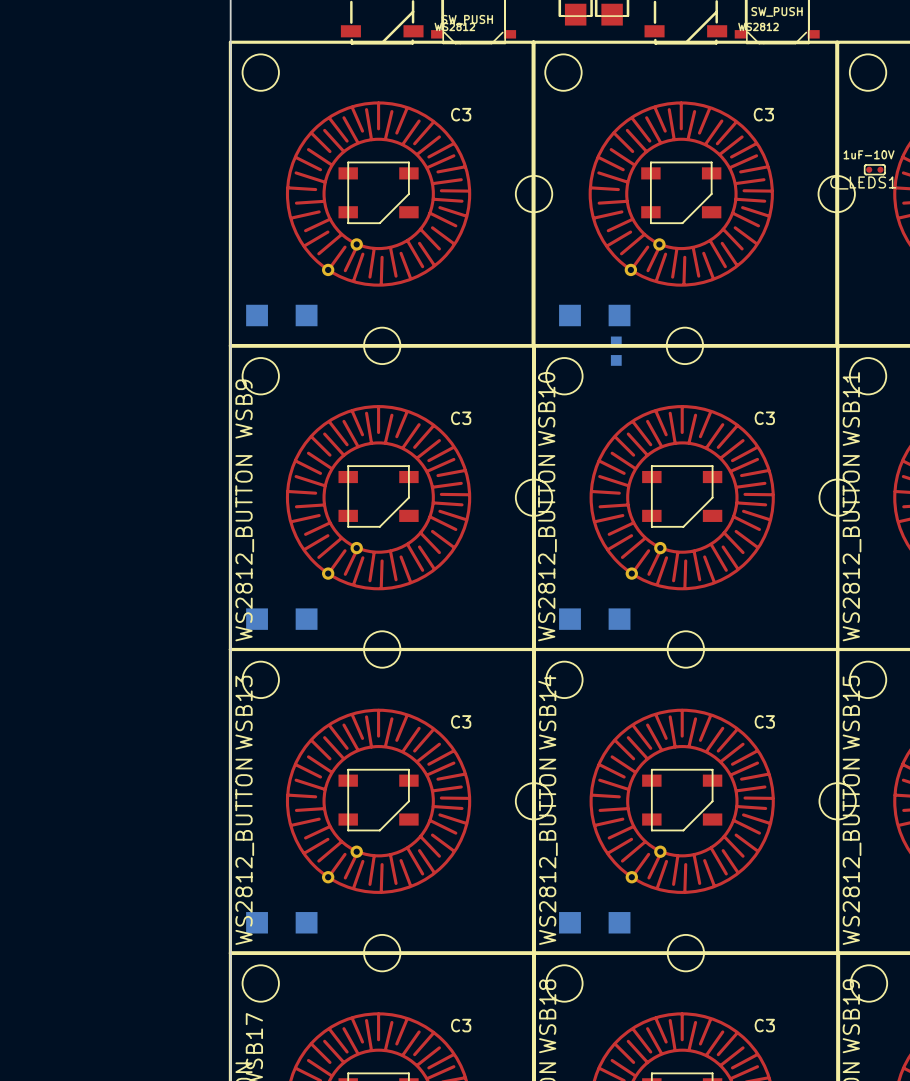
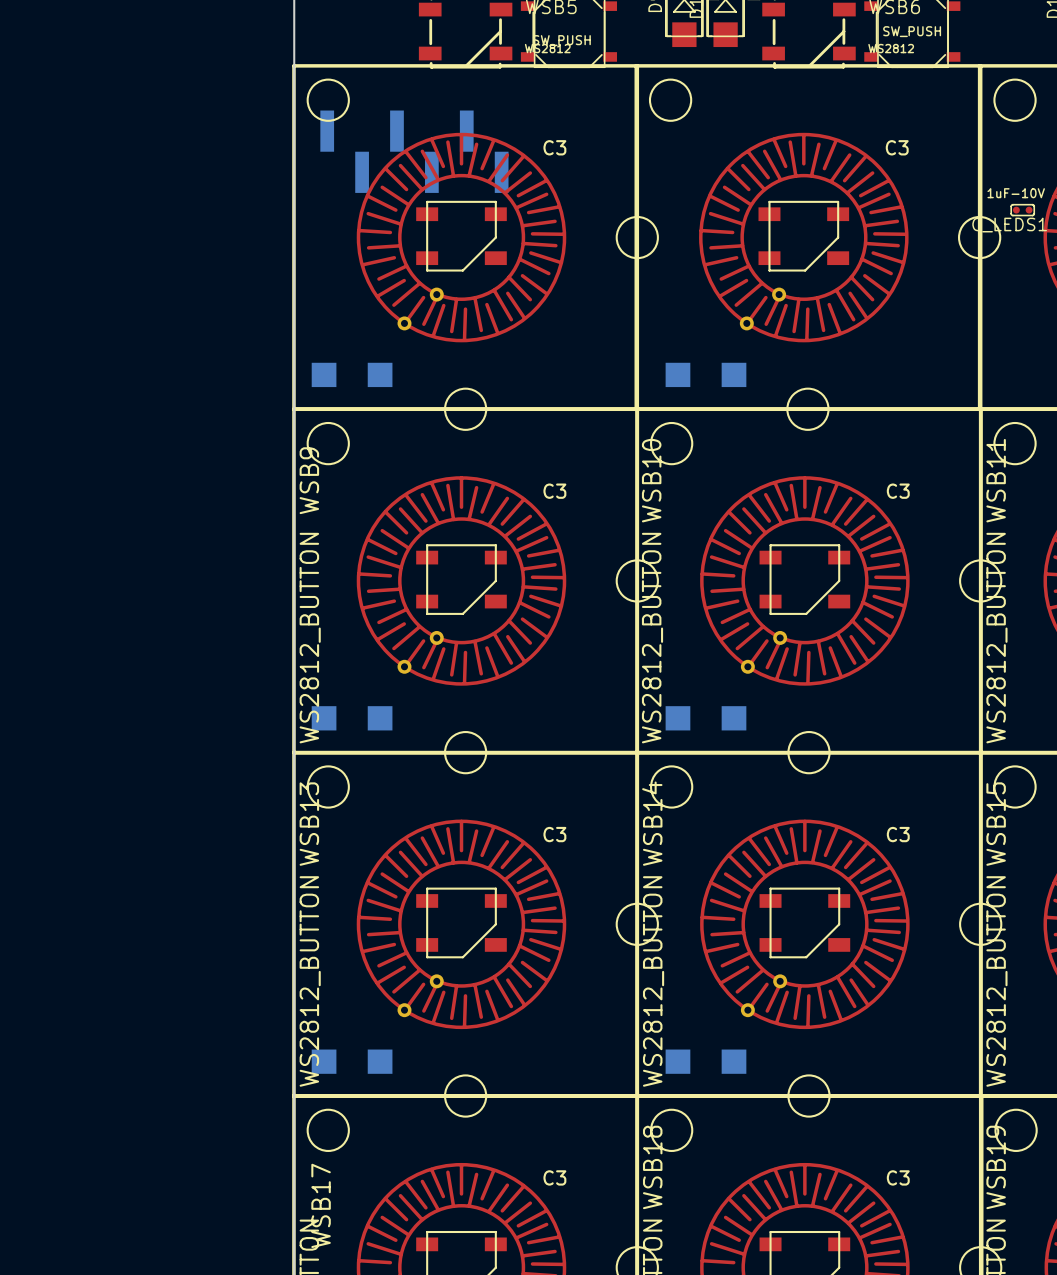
part: none -> (414, 151)
part: (616, 351) -> none

